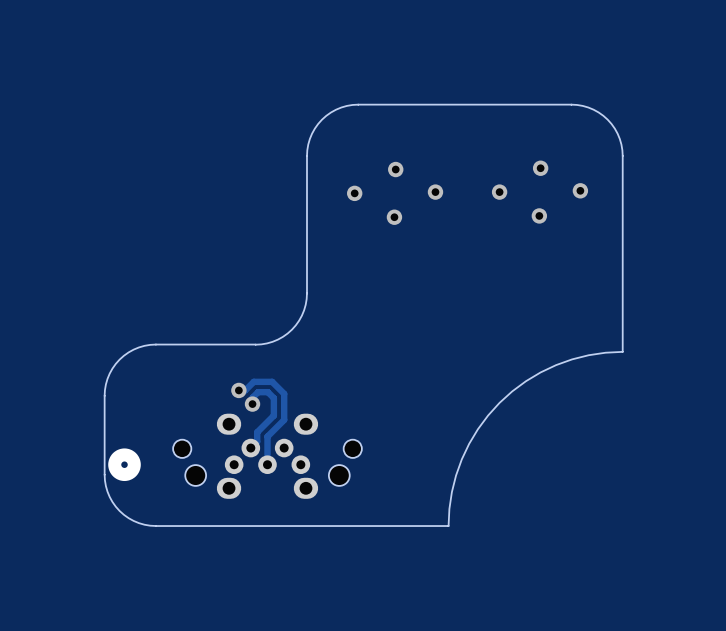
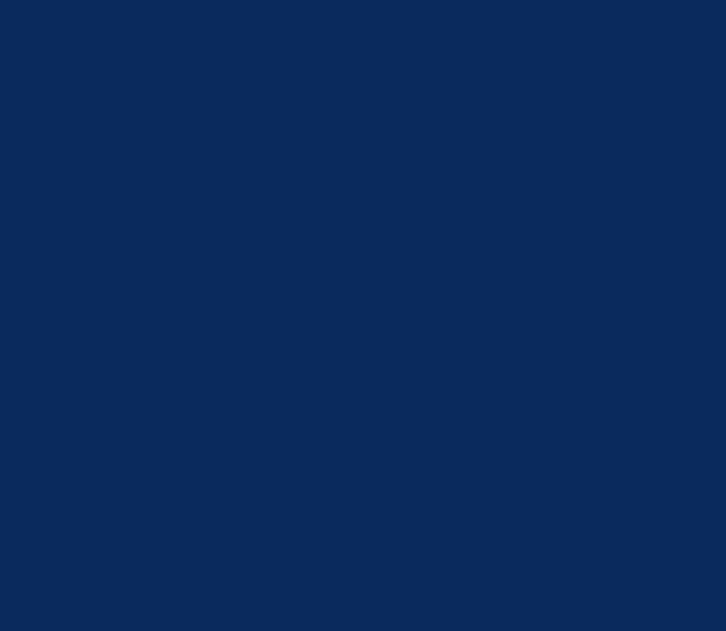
via: (540, 168) -> none
via: (395, 169) -> none
via: (580, 190) -> none
via: (435, 192) -> none
via: (499, 192) -> none
via: (354, 193) -> none
via: (539, 215) -> none
via: (394, 217) -> none
board edge: (255, 344) (150, 344) (133, 349) (115, 363) (107, 378) (104, 390) (104, 474) (109, 496) (119, 510) (133, 520) (155, 526) (448, 526) (451, 492) (461, 459) (477, 429) (499, 402) (525, 381) (556, 365) (588, 355) (622, 351) (622, 155) (619, 138) (614, 128) (598, 112) (577, 104) (358, 104) (346, 105) (330, 112) (314, 128) (307, 150) (306, 293) (304, 310) (299, 320) (287, 333) (272, 341) (255, 344) -> none
track: (238, 390) (245, 390) (253, 381) (272, 381) (284, 393) (284, 419) (267, 436) (267, 464) -> none
via: (238, 390) -> none
track: (252, 404) (252, 397) (258, 392) (267, 392) (273, 398) (273, 415) (257, 432) (257, 441) (250, 448) -> none
via: (252, 404) -> none
part: (235, 456) -> none

